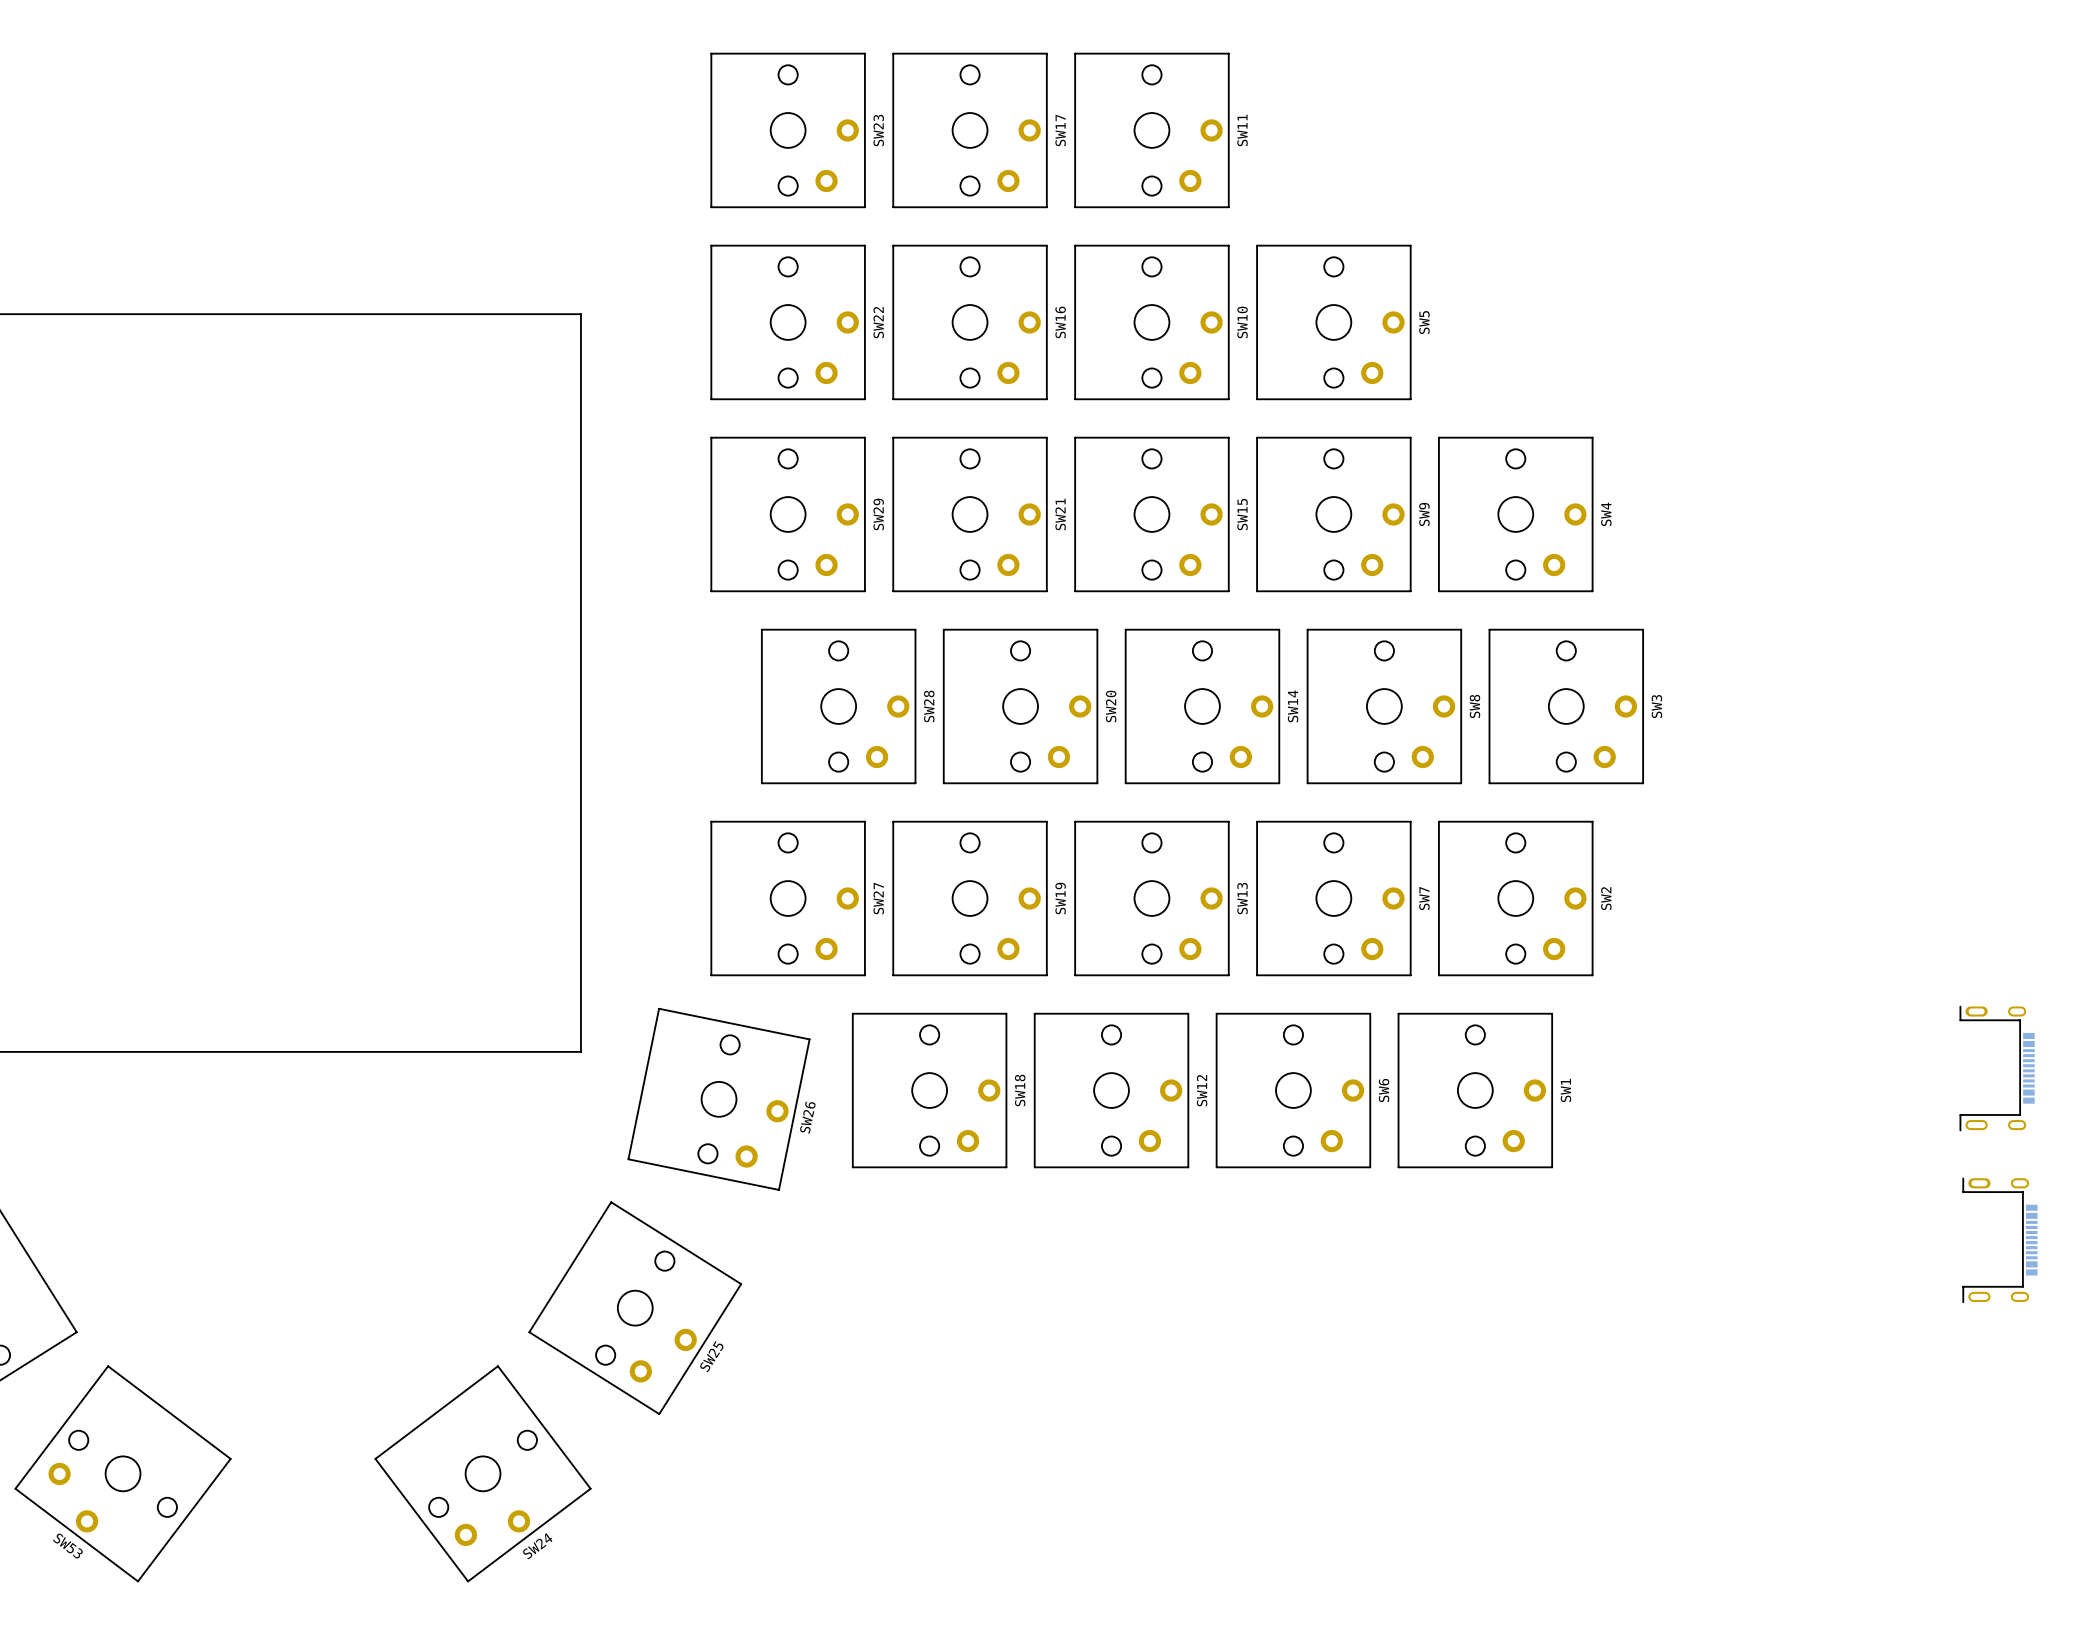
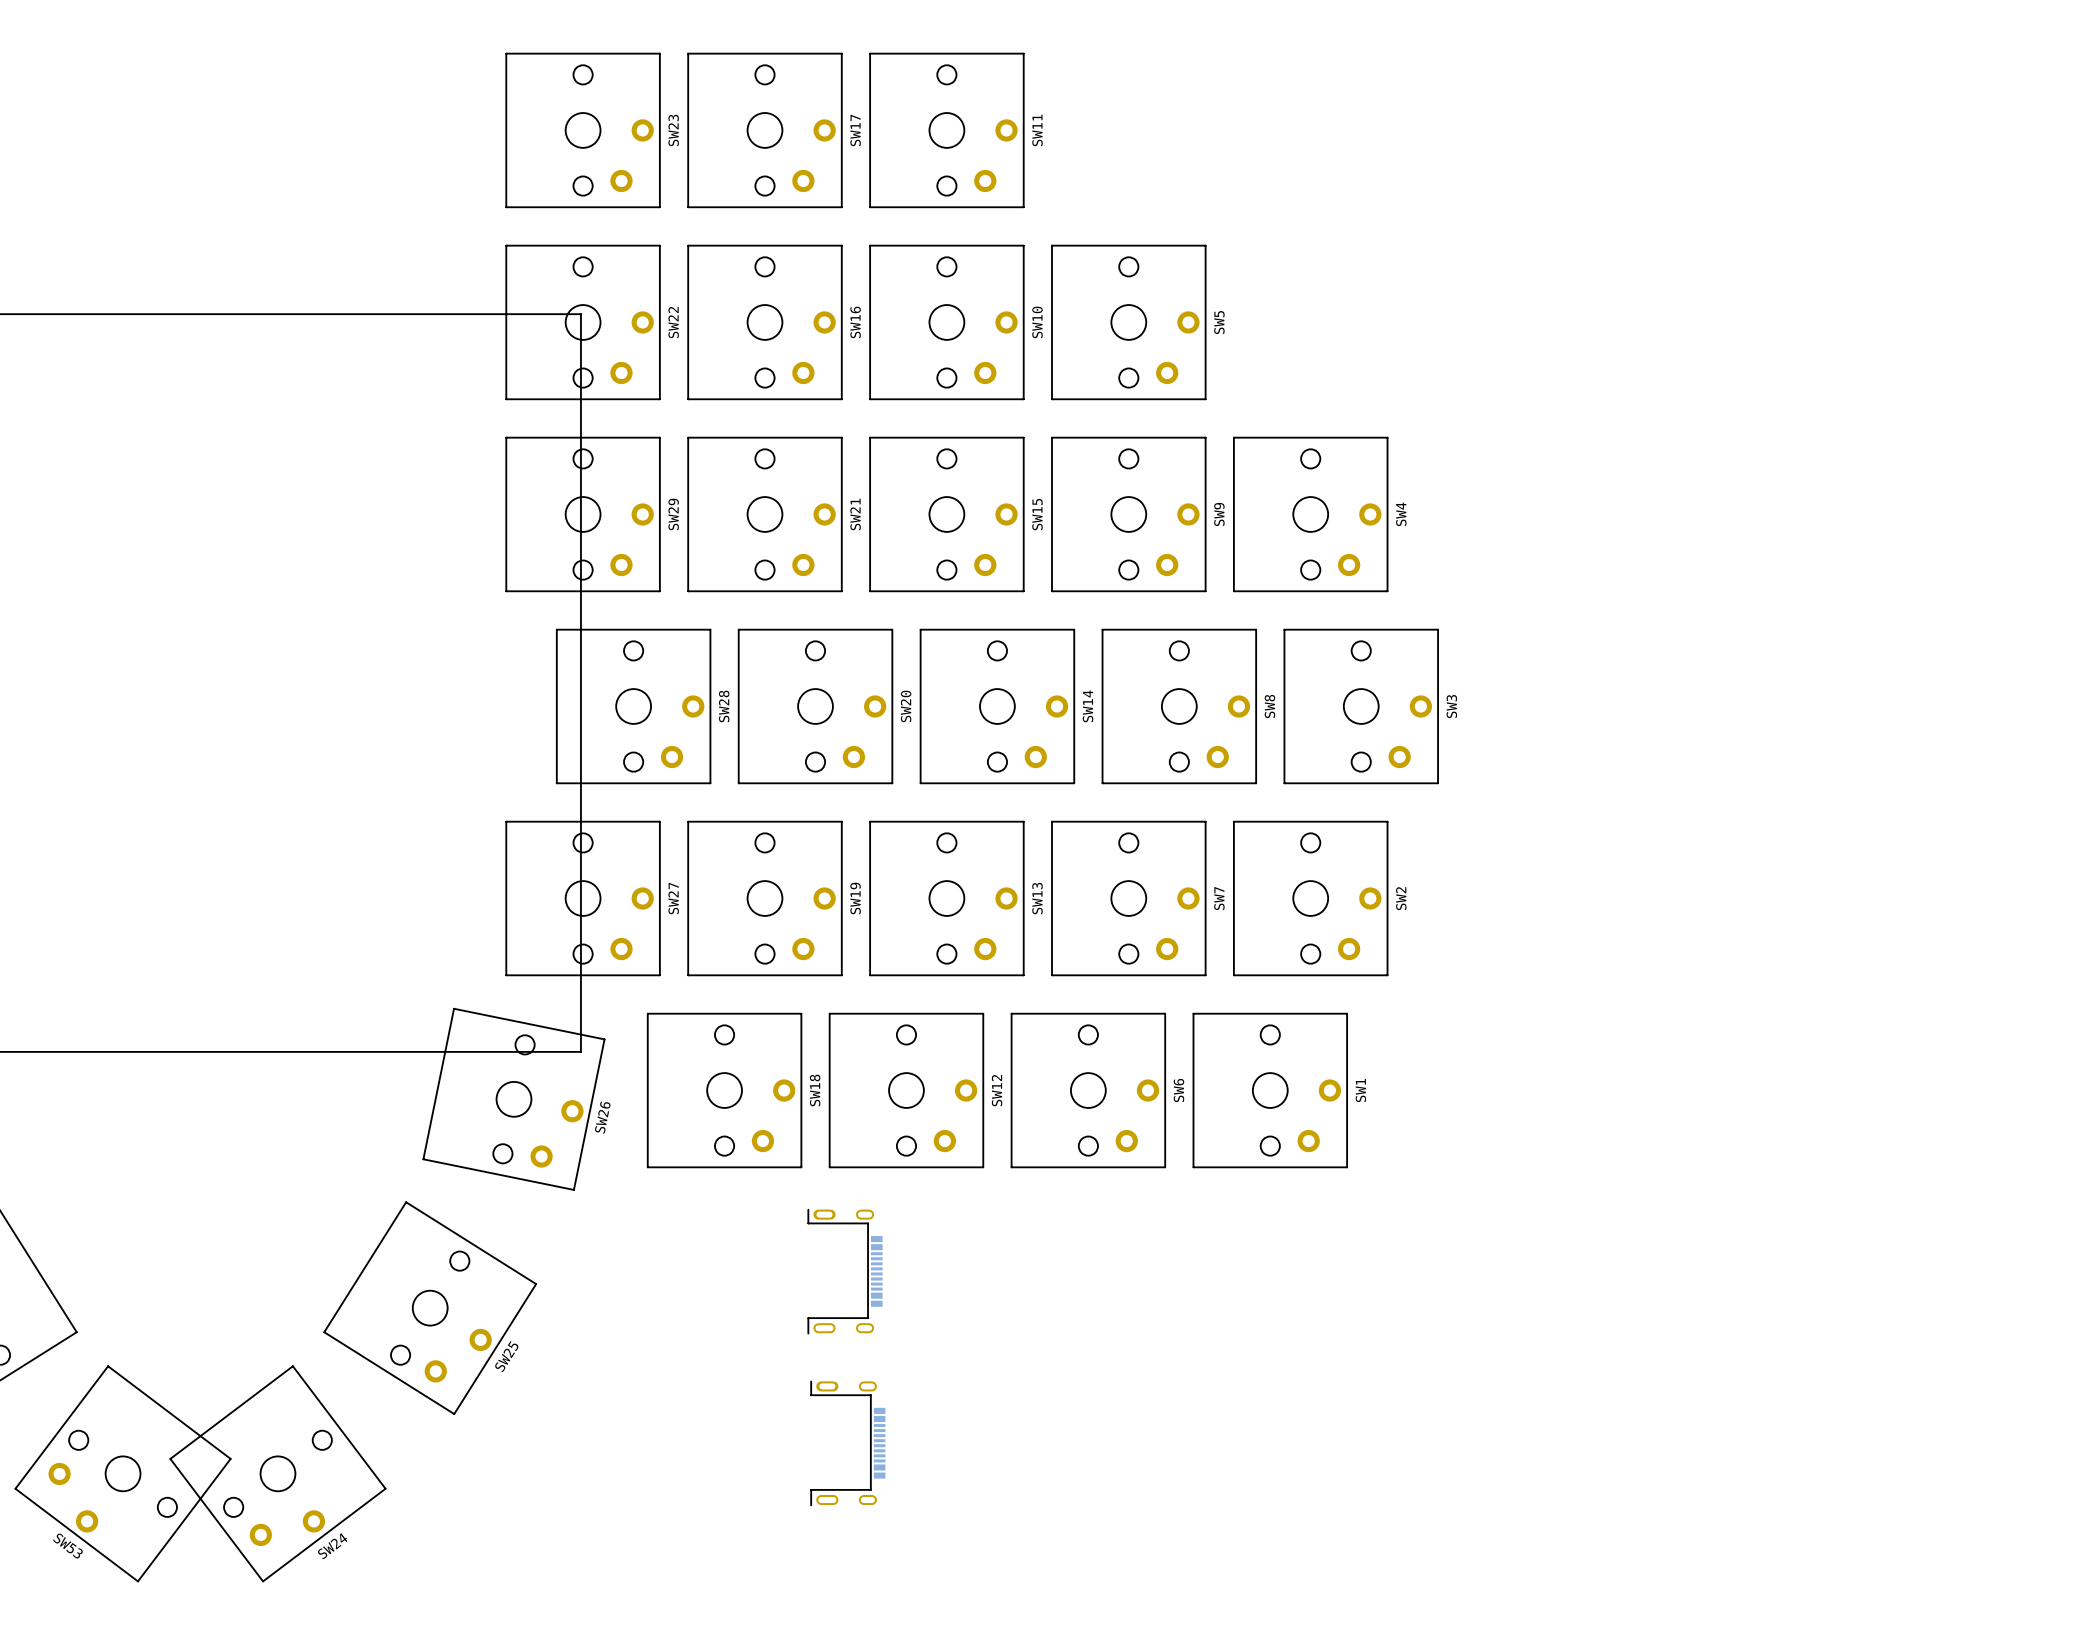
SW23 position: (788, 130) -> (583, 130)
SW17 position: (970, 130) -> (764, 130)
SW11 position: (1151, 130) -> (946, 130)
SW22 position: (788, 322) -> (583, 322)
SW16 position: (970, 322) -> (764, 322)
SW10 position: (1151, 322) -> (946, 322)
SW5 position: (1333, 322) -> (1128, 322)
SW29 position: (788, 514) -> (583, 514)
SW21 position: (970, 514) -> (764, 514)
SW15 position: (1151, 514) -> (946, 514)
SW9 position: (1333, 514) -> (1128, 514)
SW4 position: (1515, 514) -> (1310, 514)
SW28 position: (838, 706) -> (633, 706)
SW20 position: (1020, 706) -> (815, 706)
SW14 position: (1202, 706) -> (997, 706)
SW8 position: (1384, 706) -> (1179, 706)
SW3 position: (1566, 706) -> (1361, 706)
SW27 position: (788, 898) -> (583, 898)
SW19 position: (970, 898) -> (764, 898)
SW13 position: (1151, 898) -> (946, 898)
SW7 position: (1333, 898) -> (1128, 898)
SW2 position: (1515, 898) -> (1310, 898)
part: (1997, 1068) -> none
SW18 position: (929, 1090) -> (724, 1090)
SW12 position: (1111, 1090) -> (906, 1090)
SW6 position: (1293, 1090) -> (1088, 1090)
SW1 position: (1475, 1090) -> (1270, 1090)
SW26 position: (719, 1099) -> (513, 1099)
part: (2000, 1240) -> none
part: none -> (845, 1271)
SW25 position: (635, 1308) -> (430, 1308)
part: none -> (848, 1443)
SW24 position: (483, 1473) -> (277, 1473)

